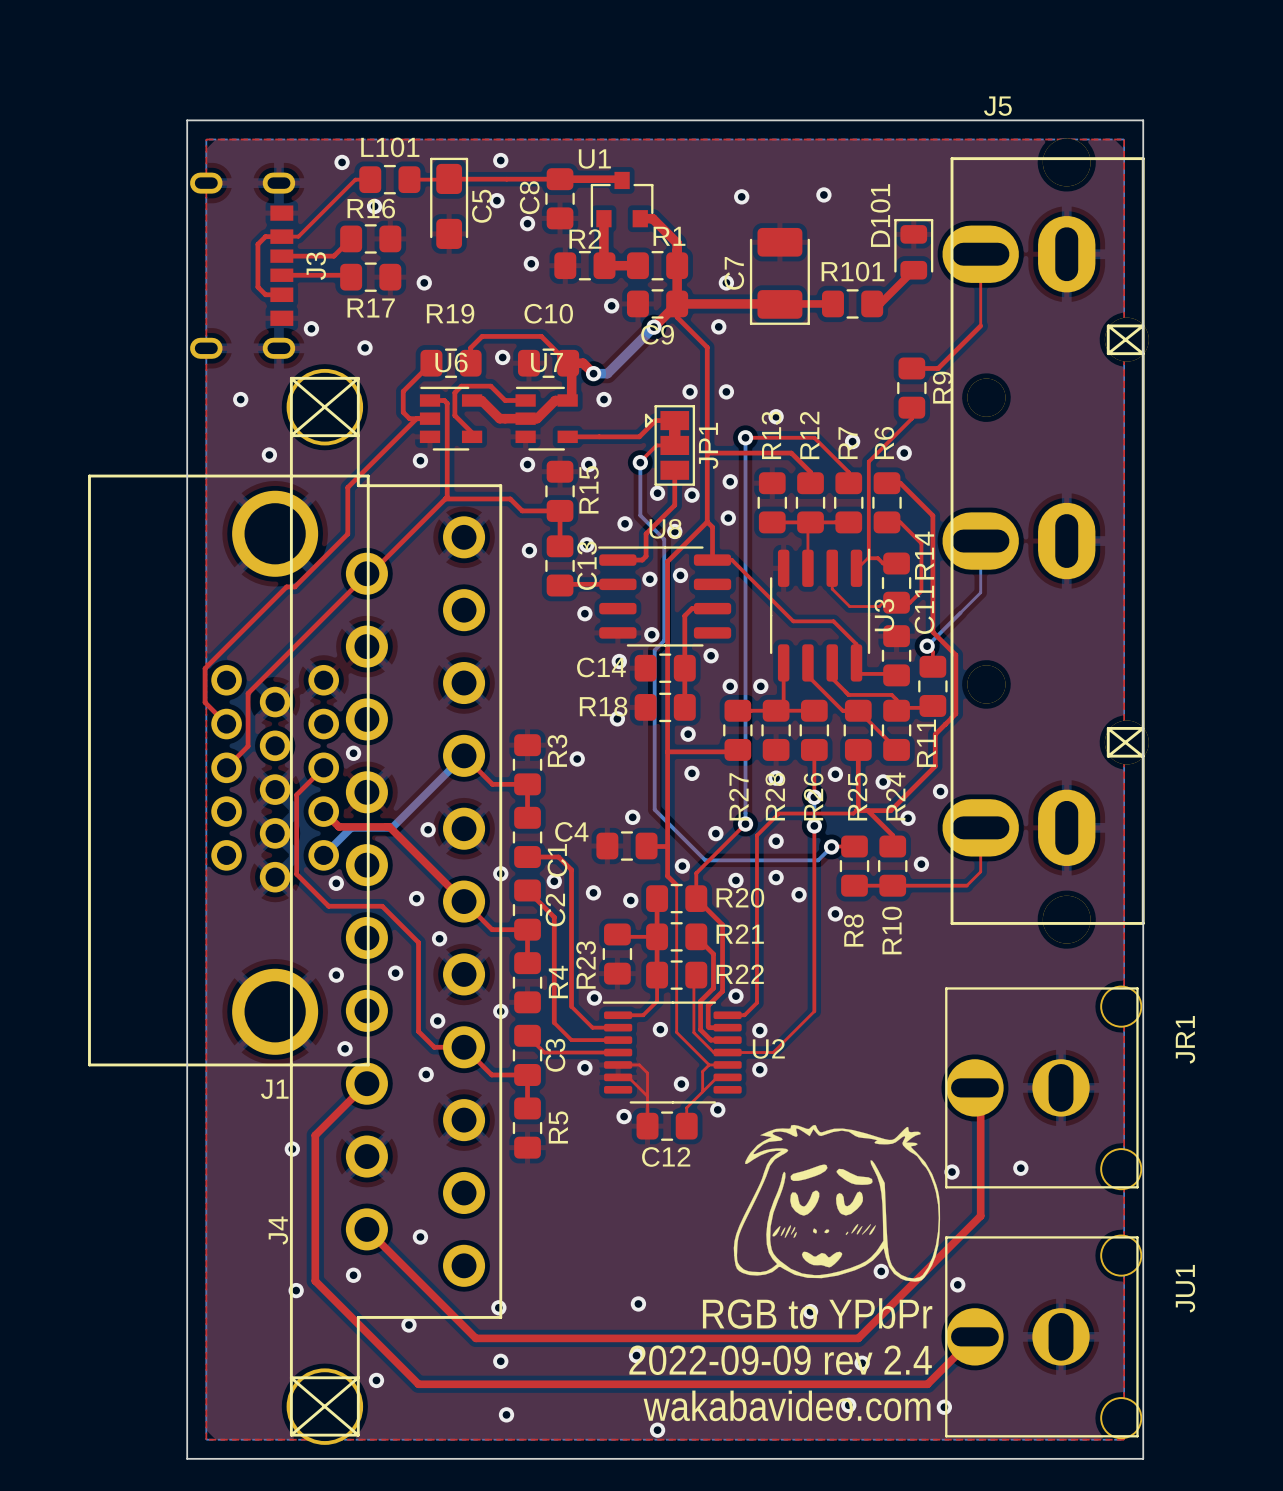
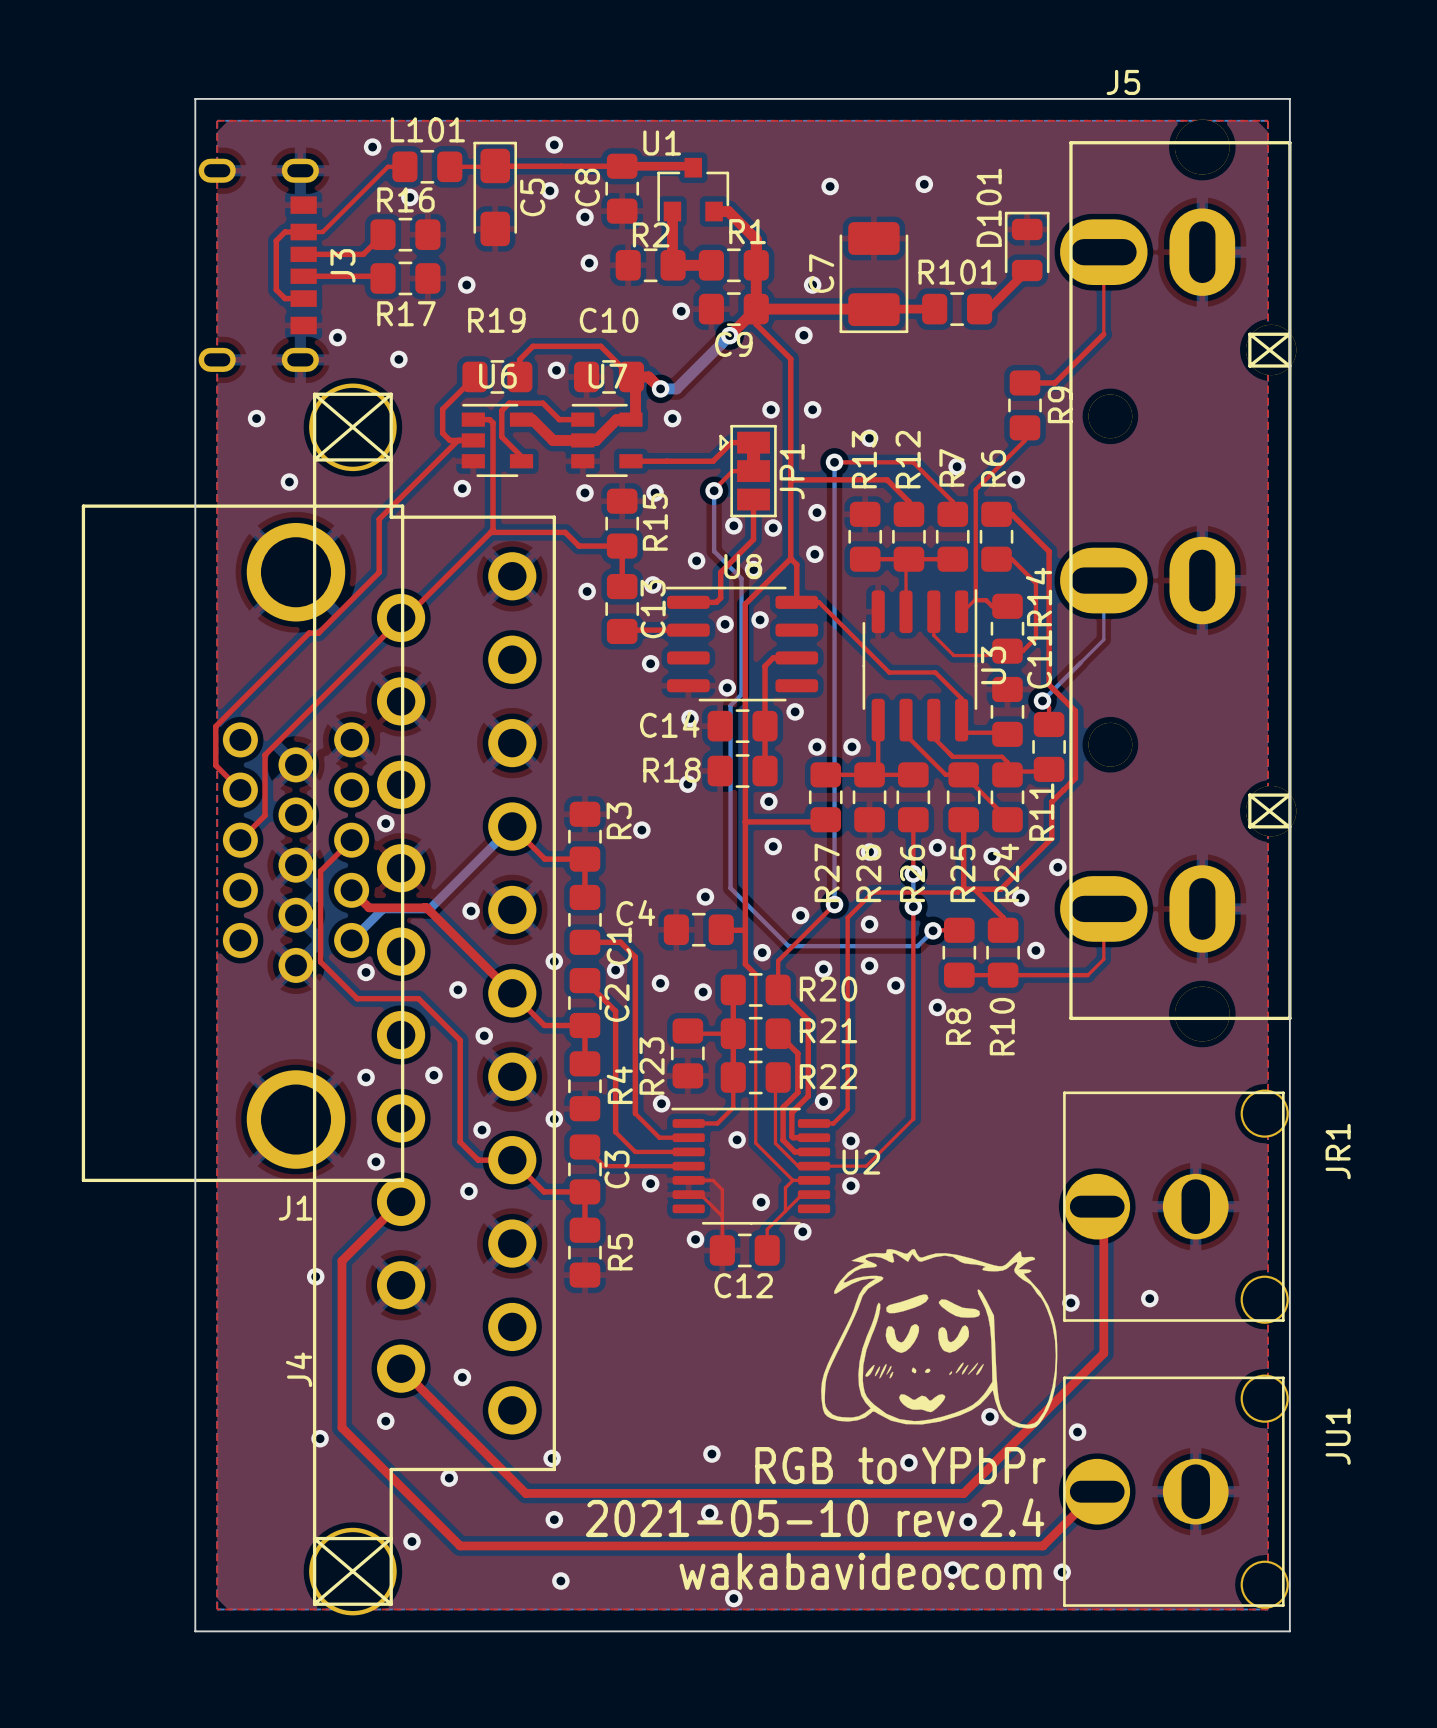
text: 2022-09-09 rev 2.4 (780, 1360) -> 2021-05-10 rev 2.4 (815, 1517)

